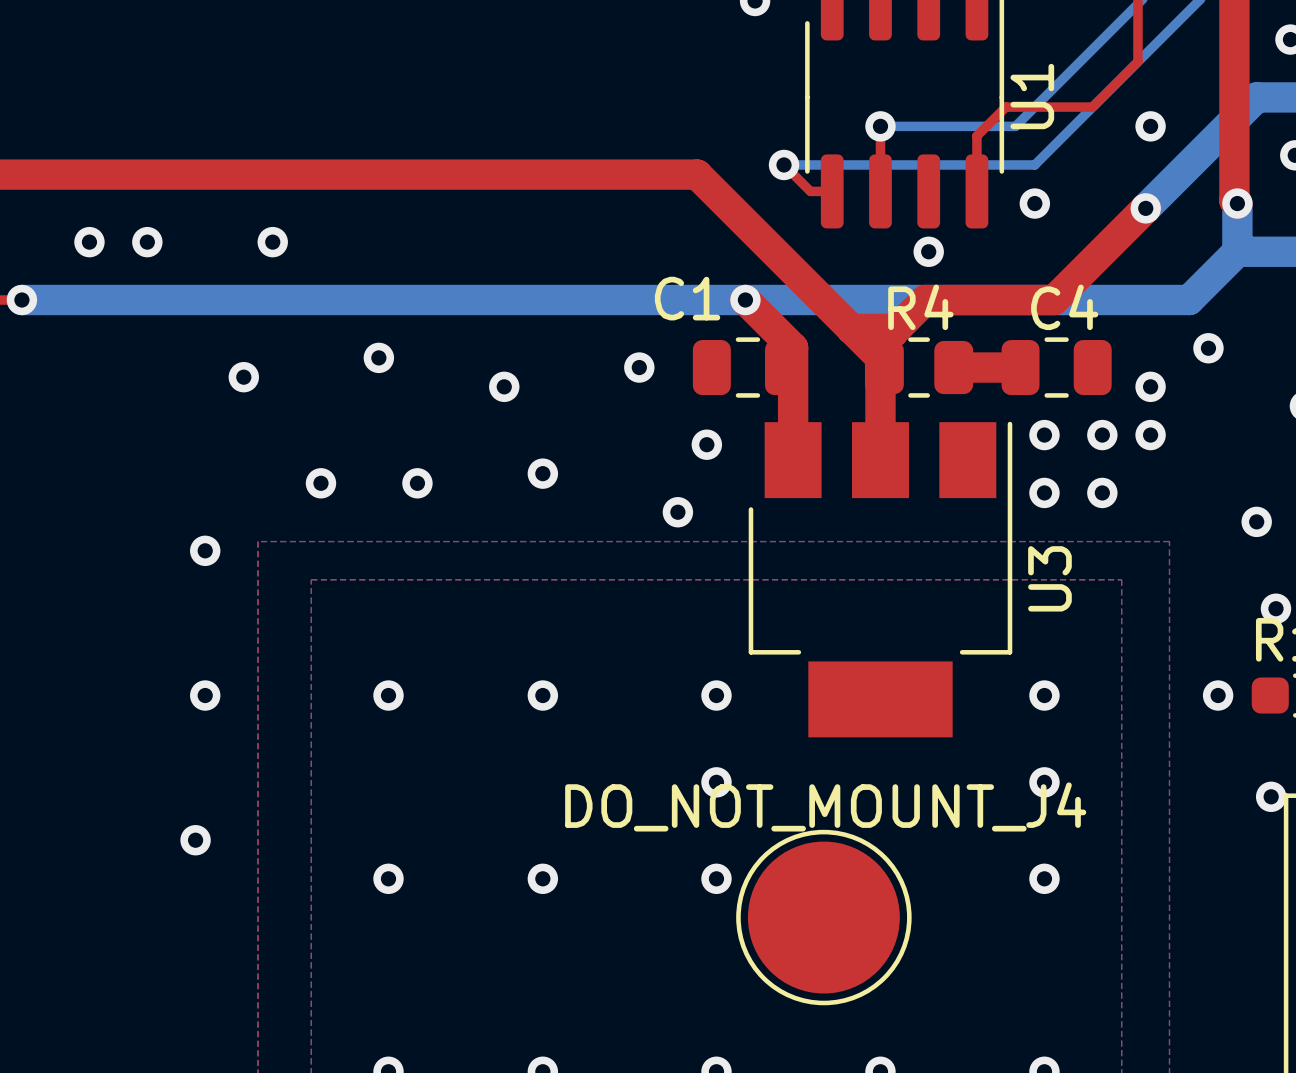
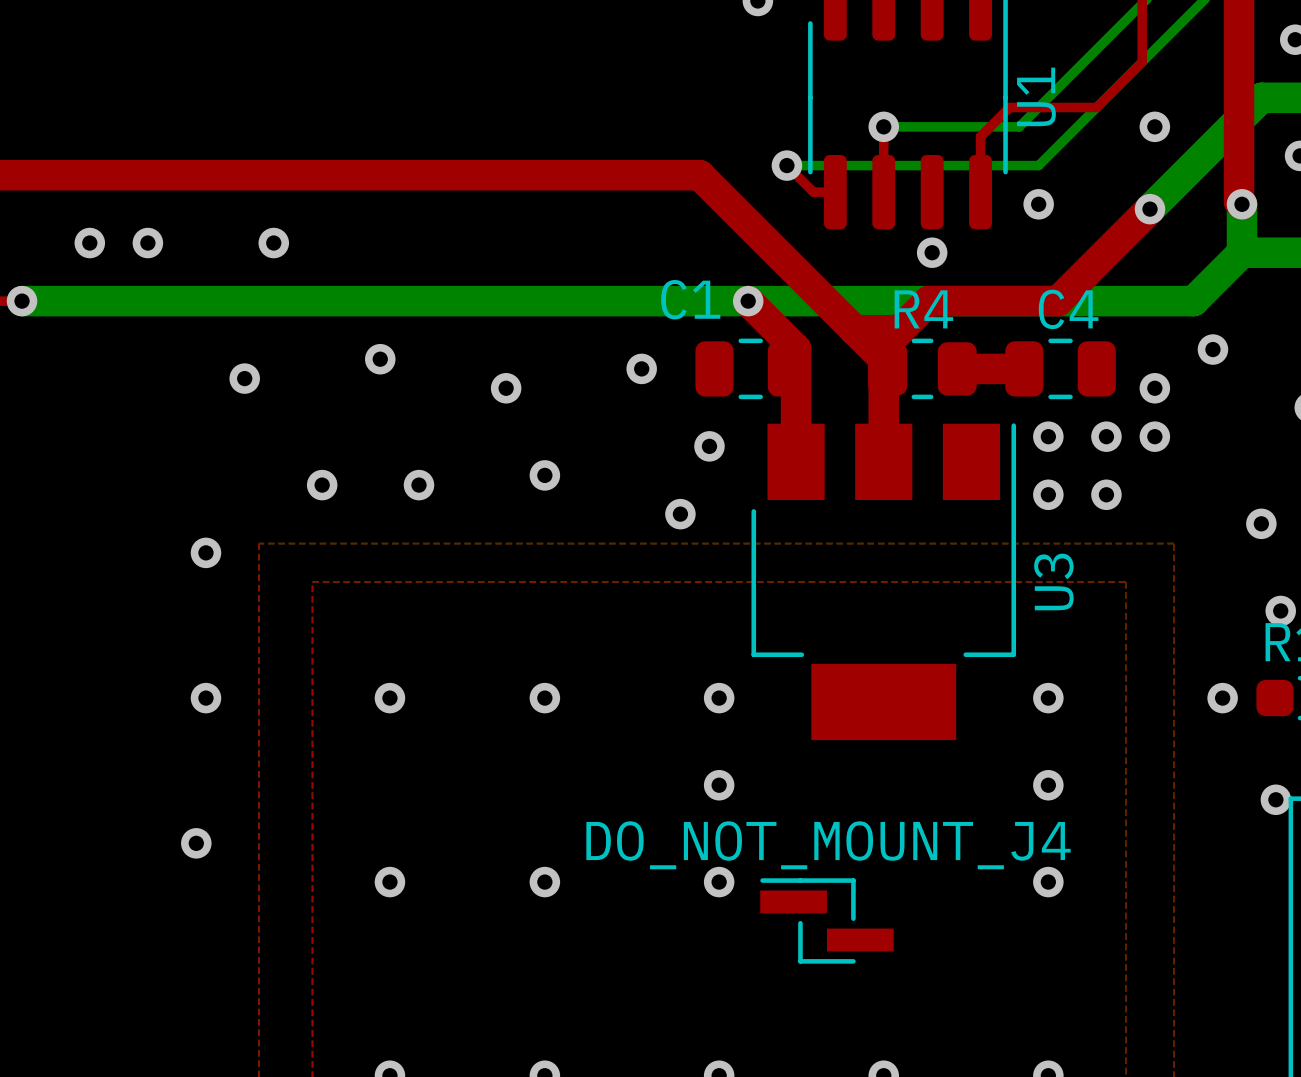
DO_NOT_MOUNT_J4 footprint: [736, 829, 912, 1006] -> [760, 878, 894, 964]

